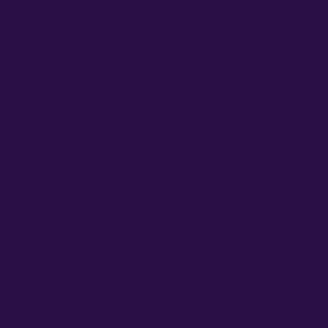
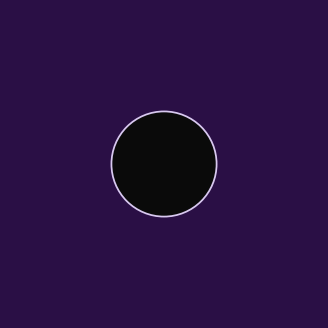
part: none -> (164, 164)

